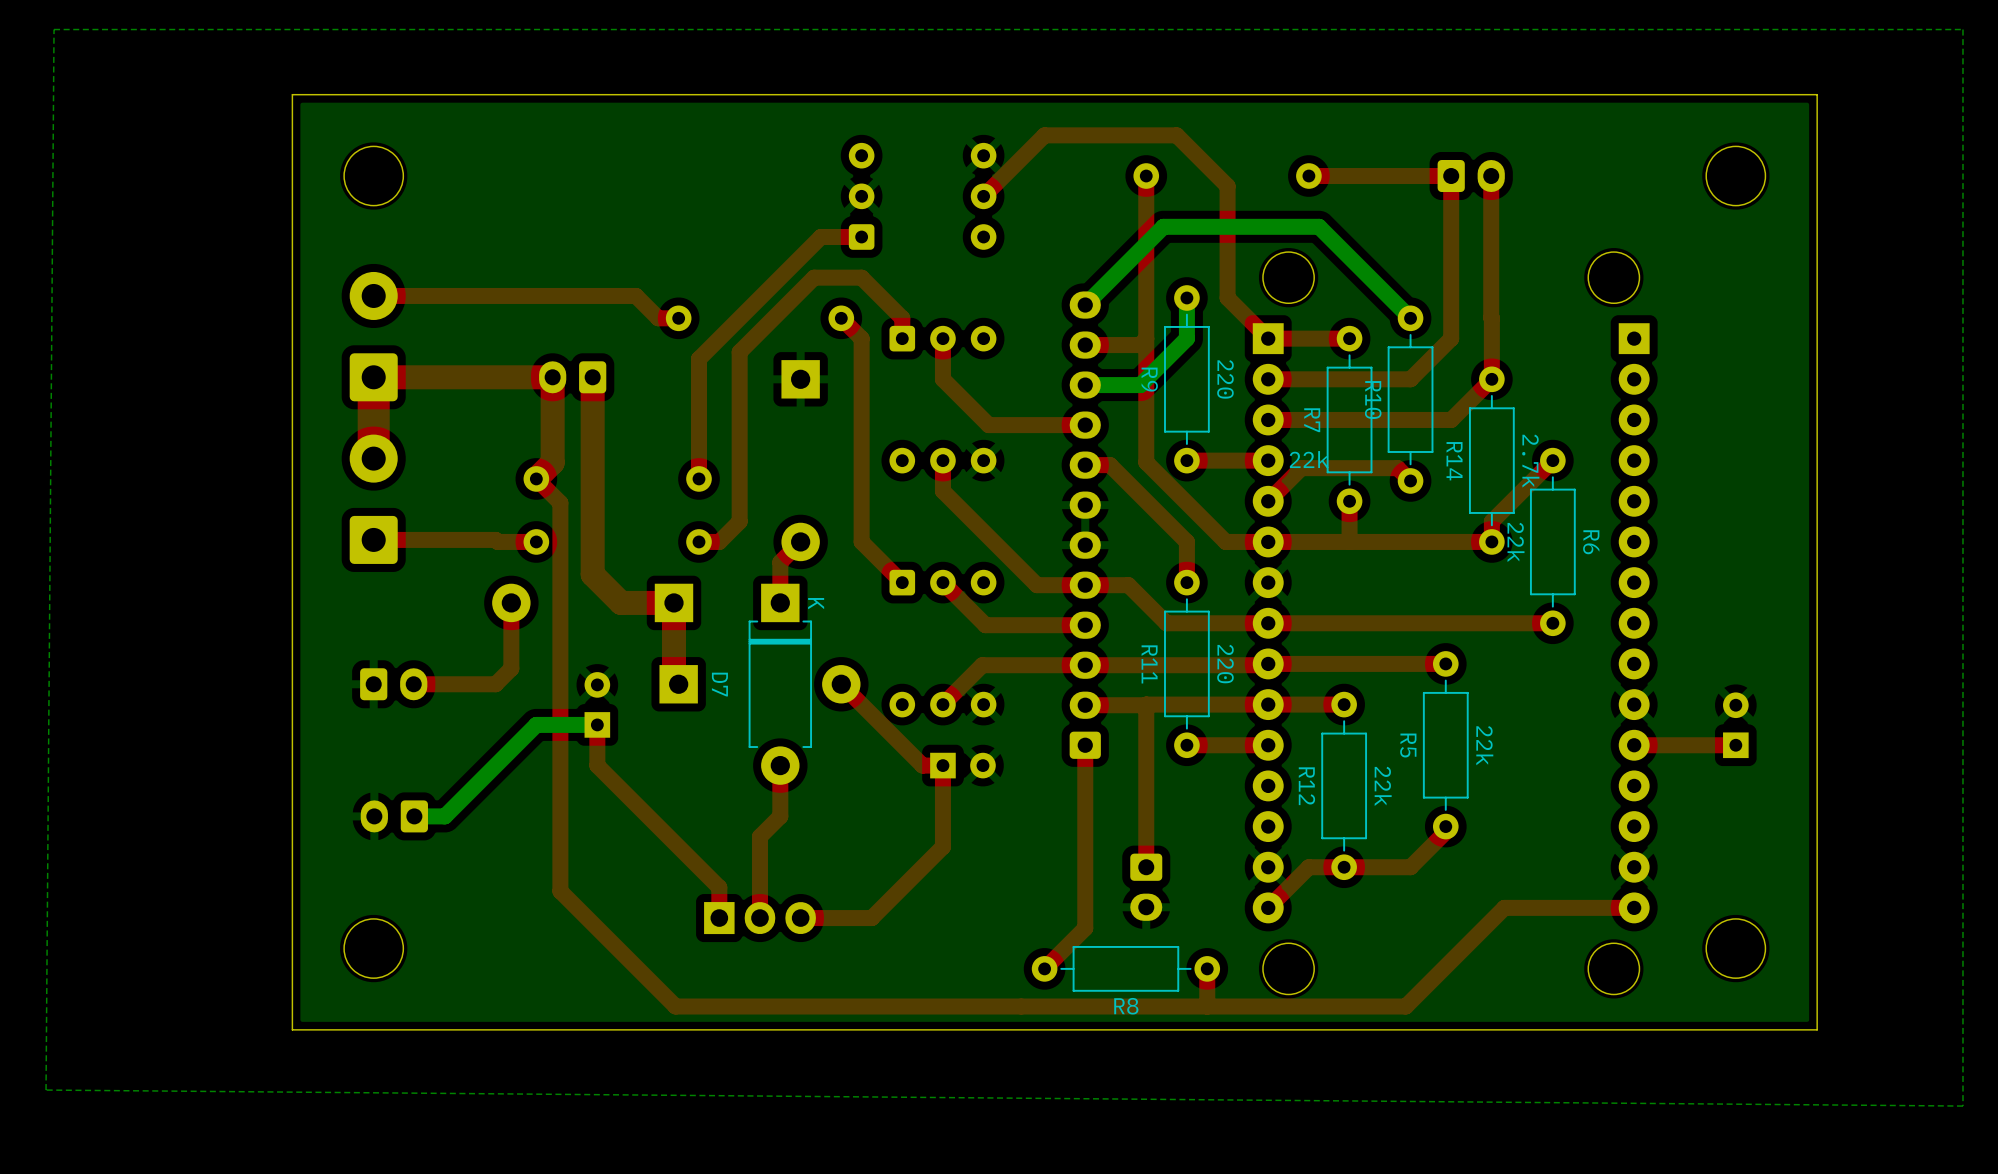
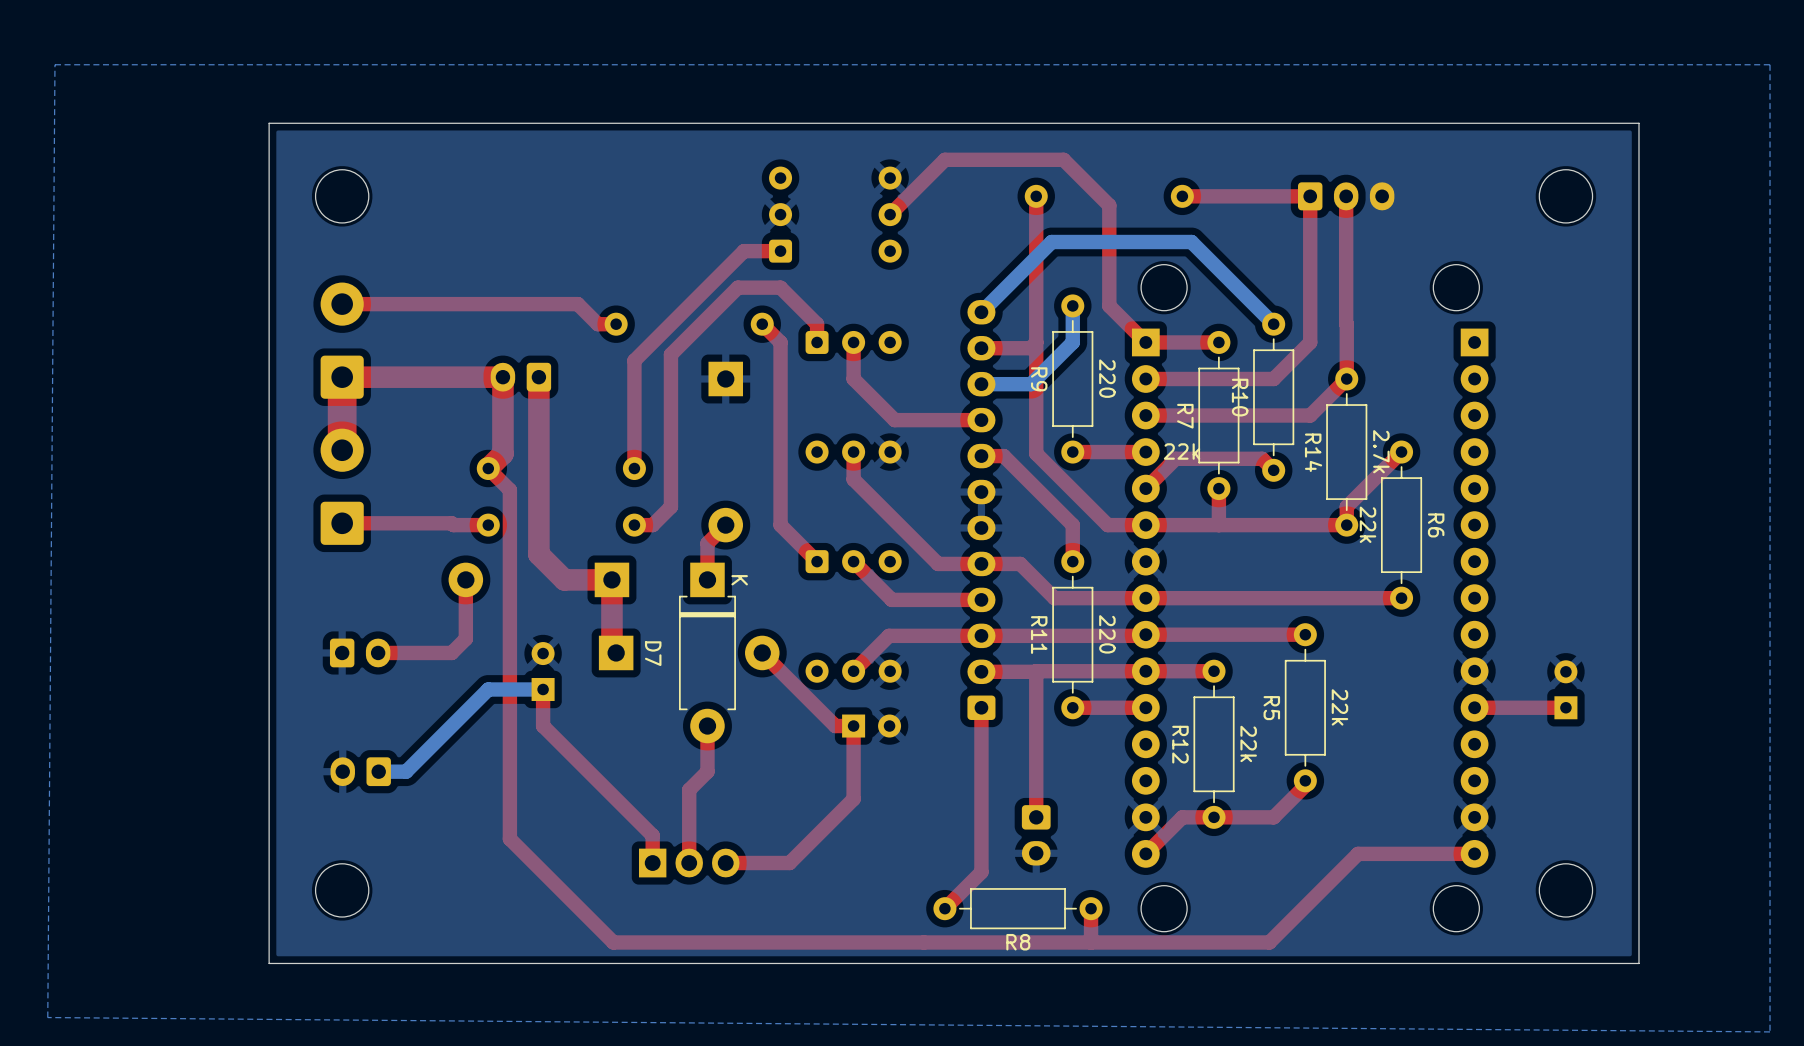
part: (1471, 176) -> none
part: none -> (1346, 196)

